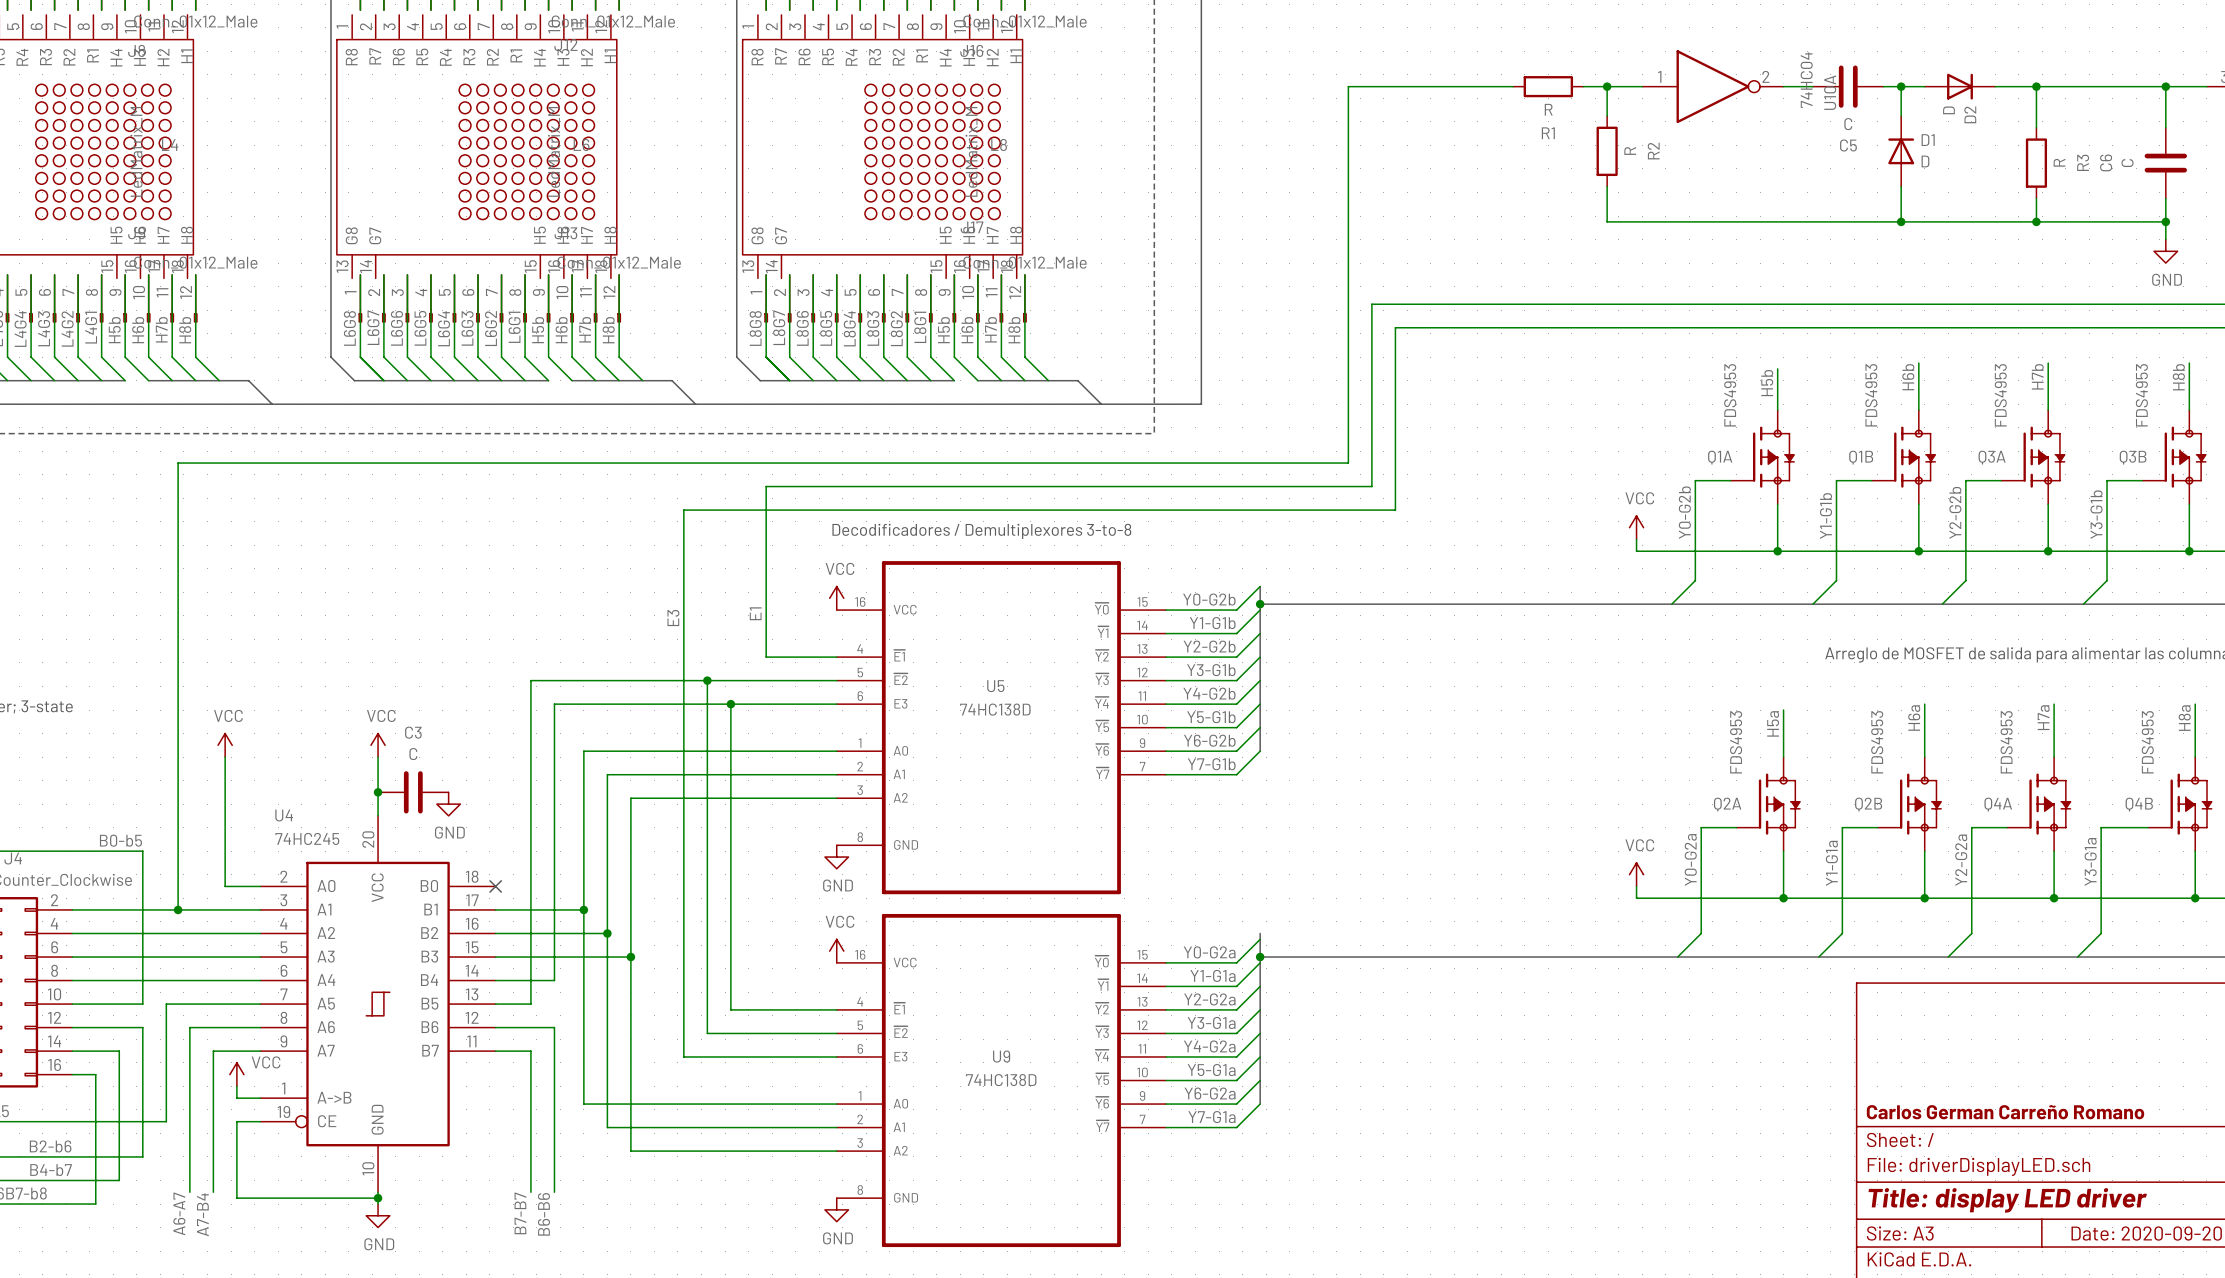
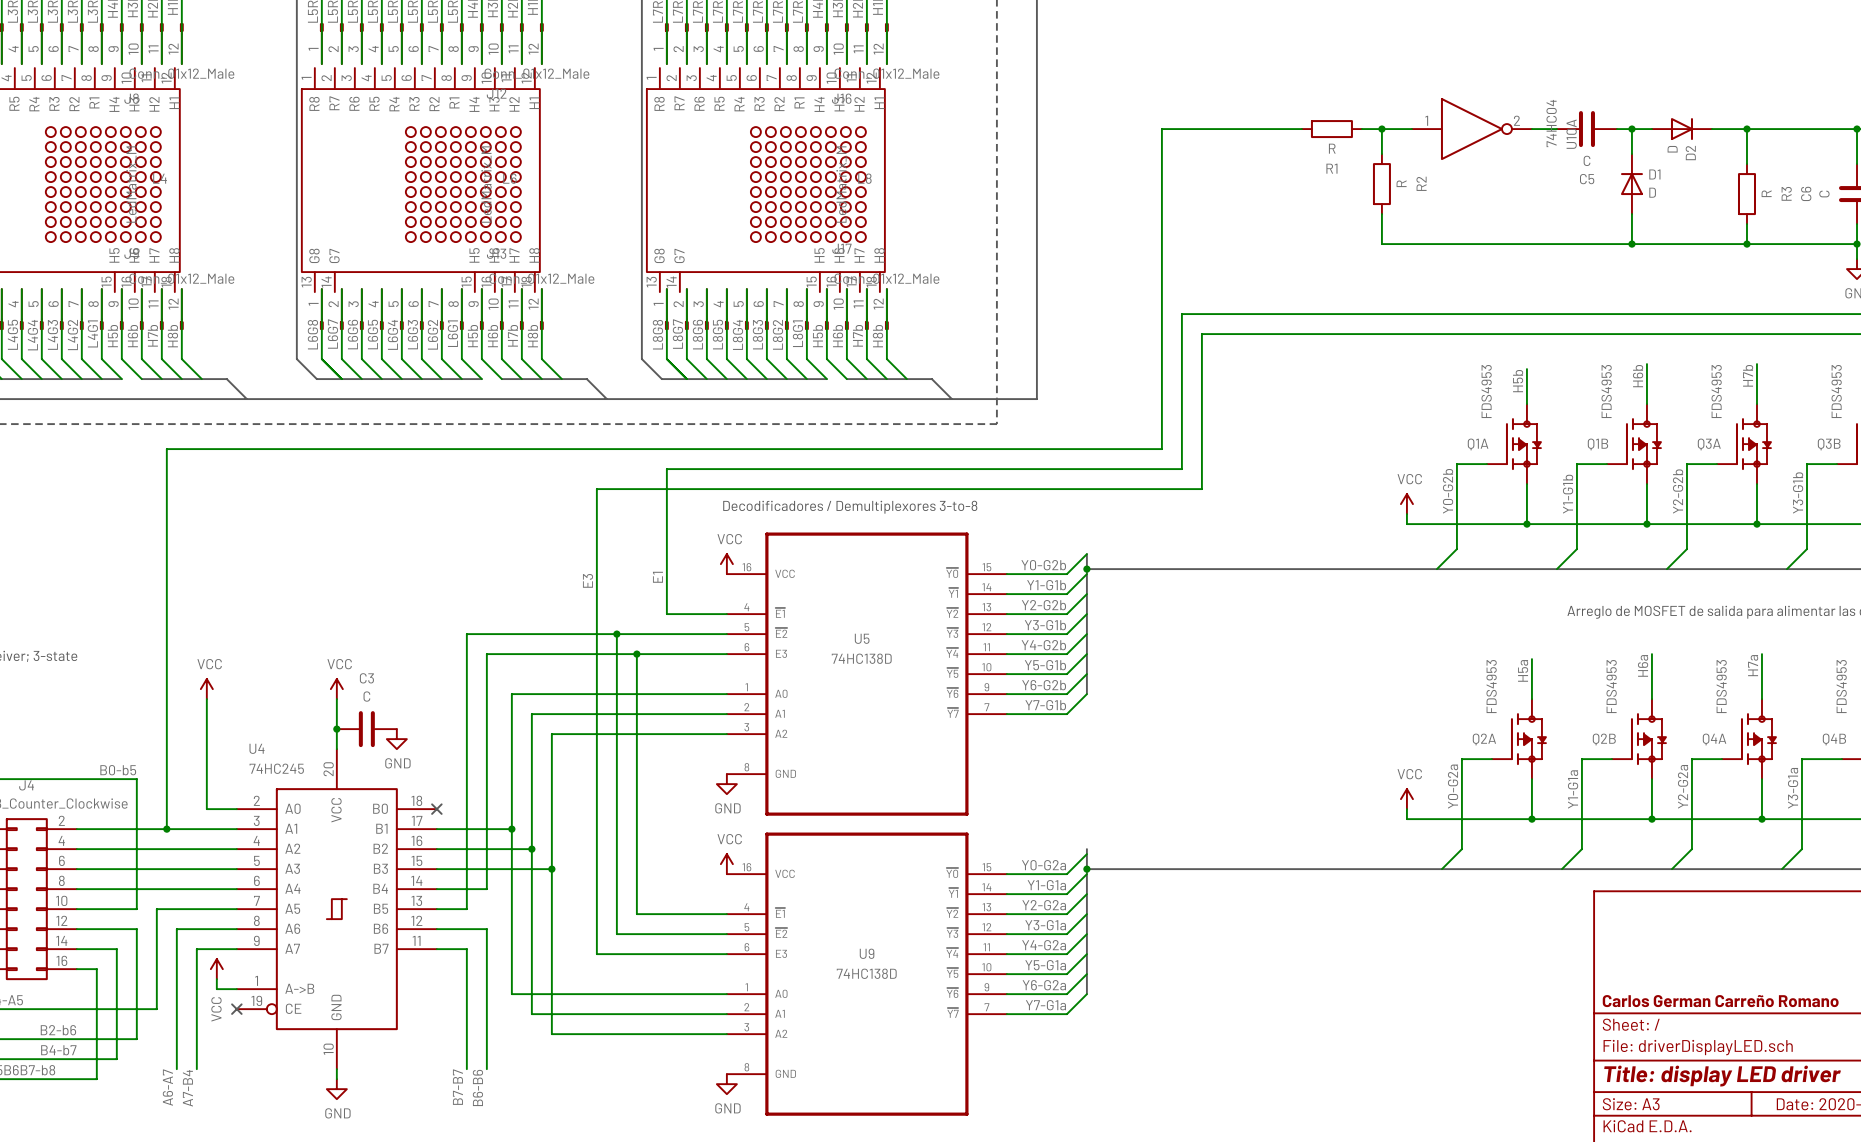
power symbol text rotation: 0° (266, 1062) -> 90° counterclockwise (216, 1009)
power symbol text position: VCC (266, 1062) -> VCC (216, 1009)
wire: (260, 1121) (236, 1121) (236, 1198) (378, 1198) -> none
no-connect mark: none -> (236, 1009)
junction: (378, 1198) -> none

